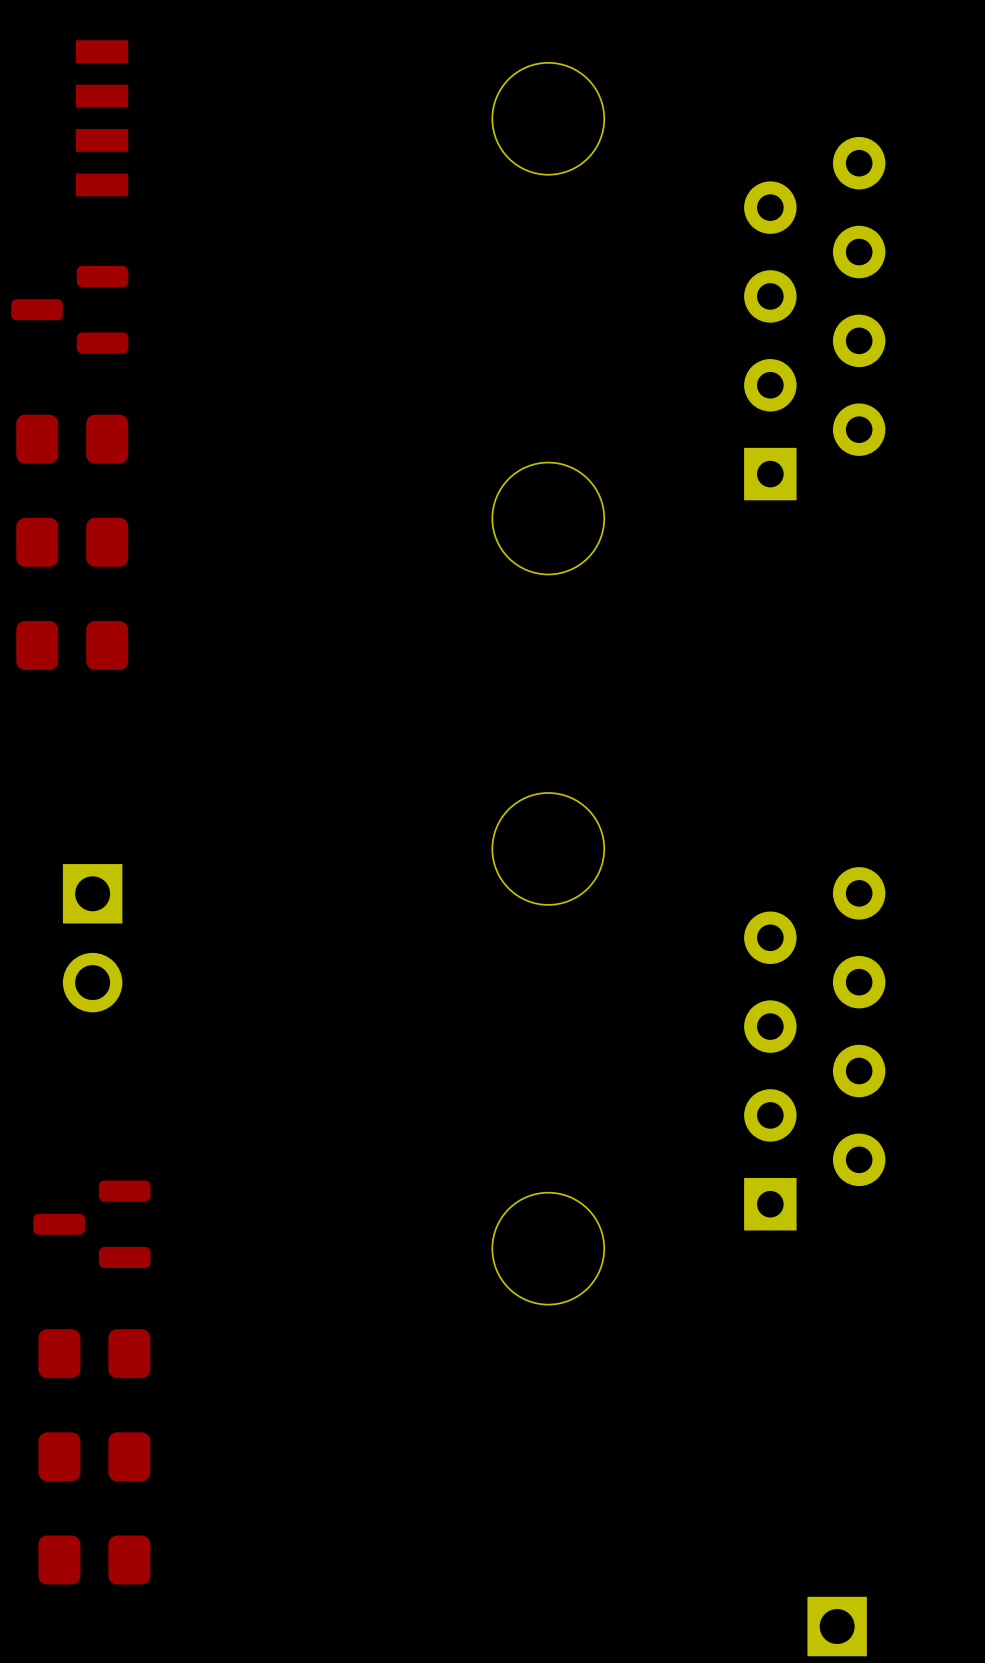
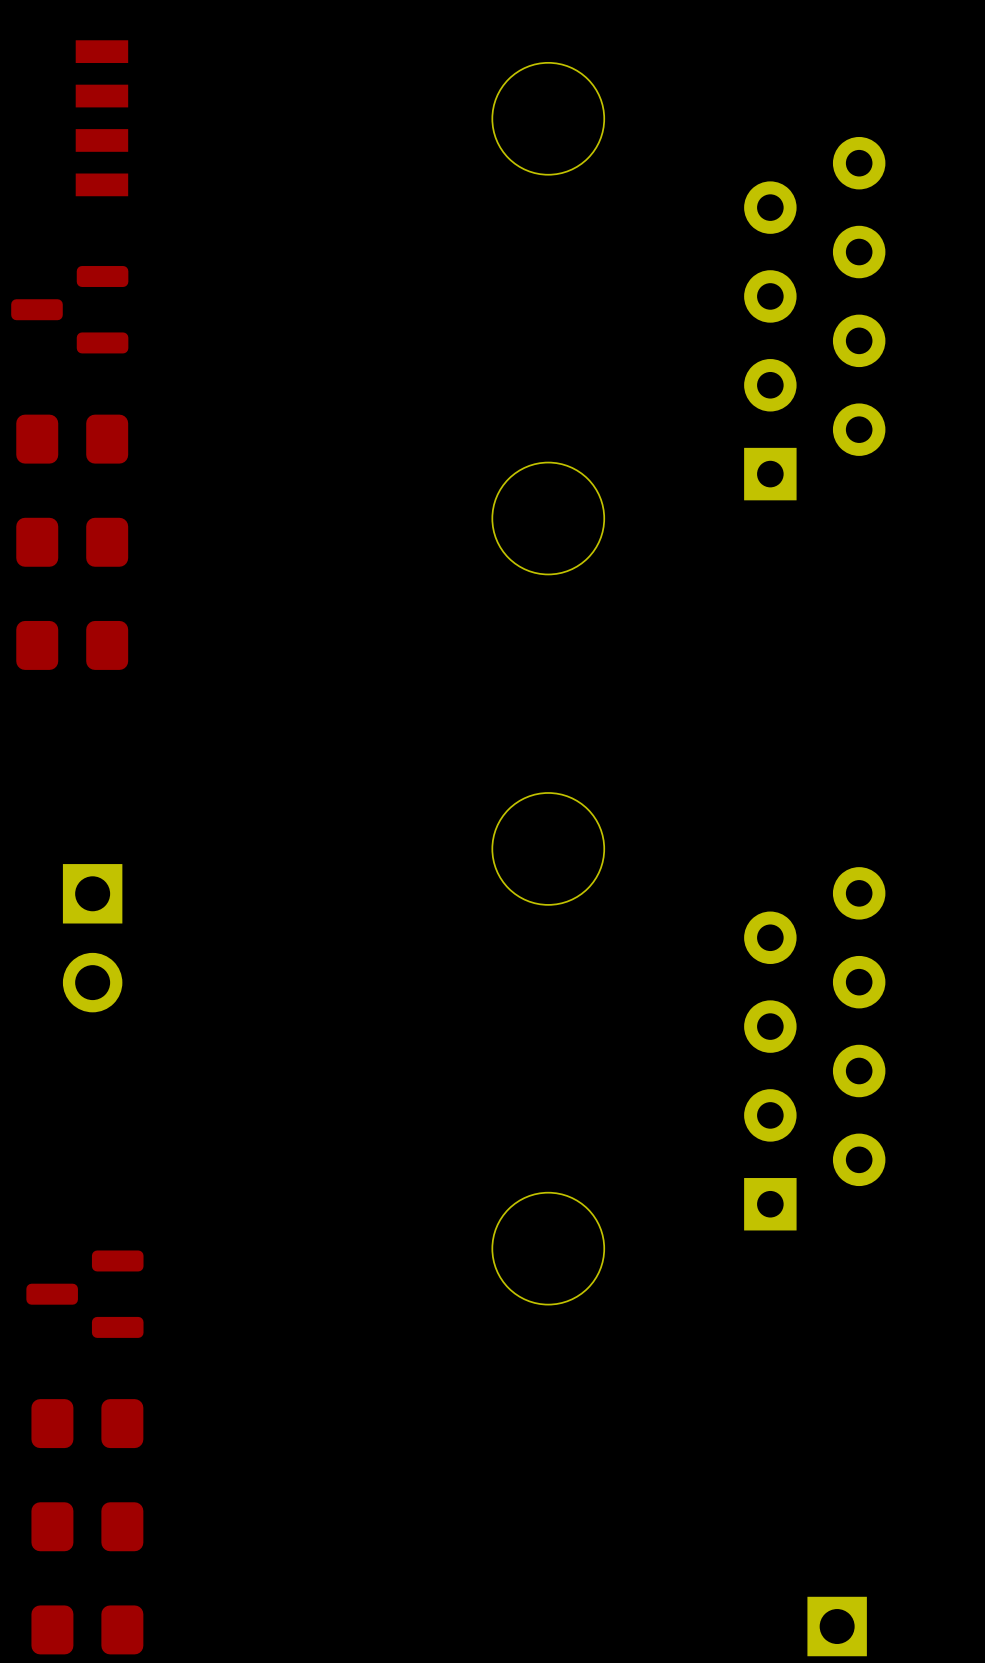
part position: (91, 1224) -> (84, 1294)
part: (94, 1353) -> none
part position: (94, 1456) -> (87, 1423)
part position: (94, 1559) -> (87, 1526)
part: none -> (87, 1629)

